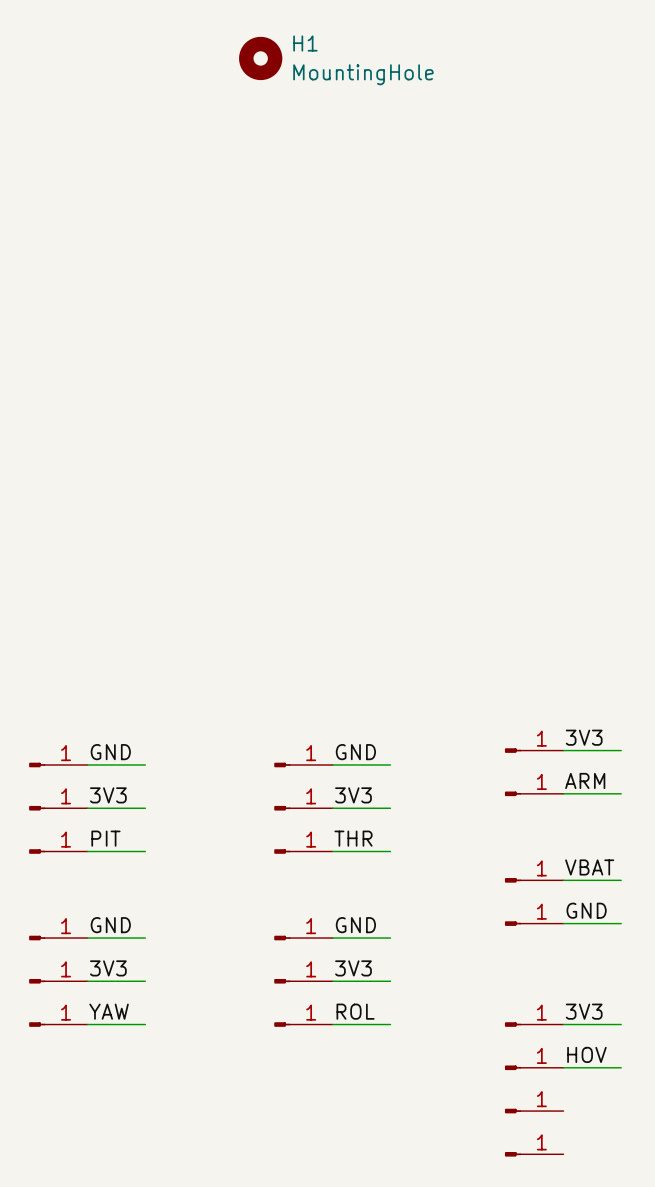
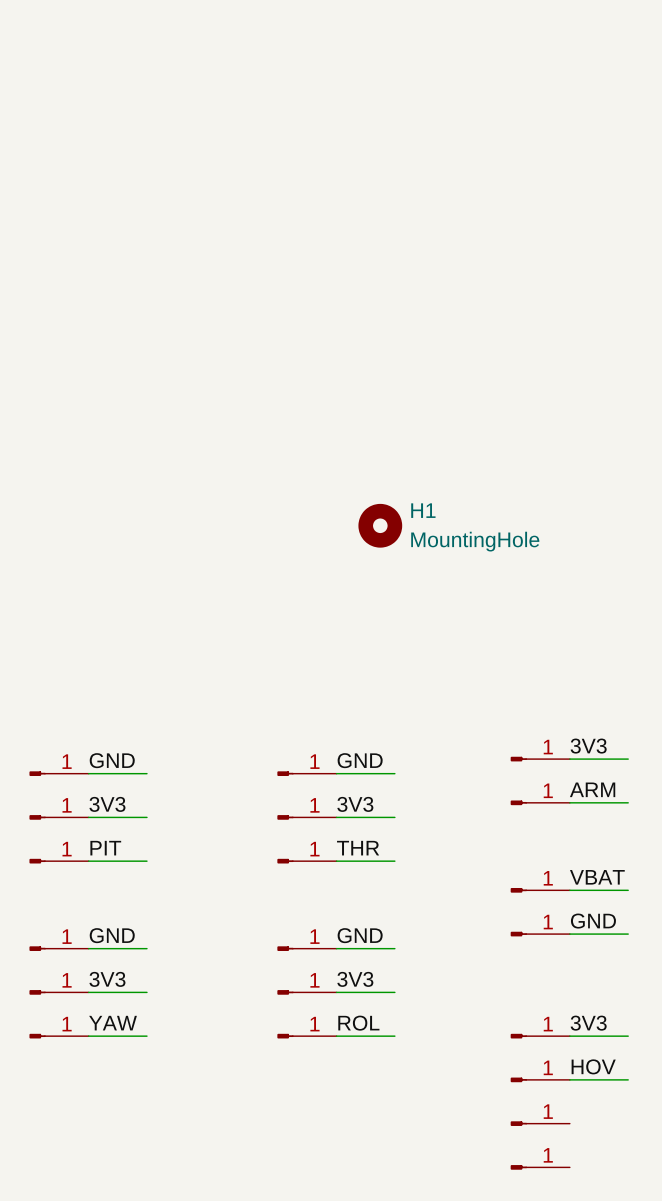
H1 position: (260, 58) -> (380, 525)

